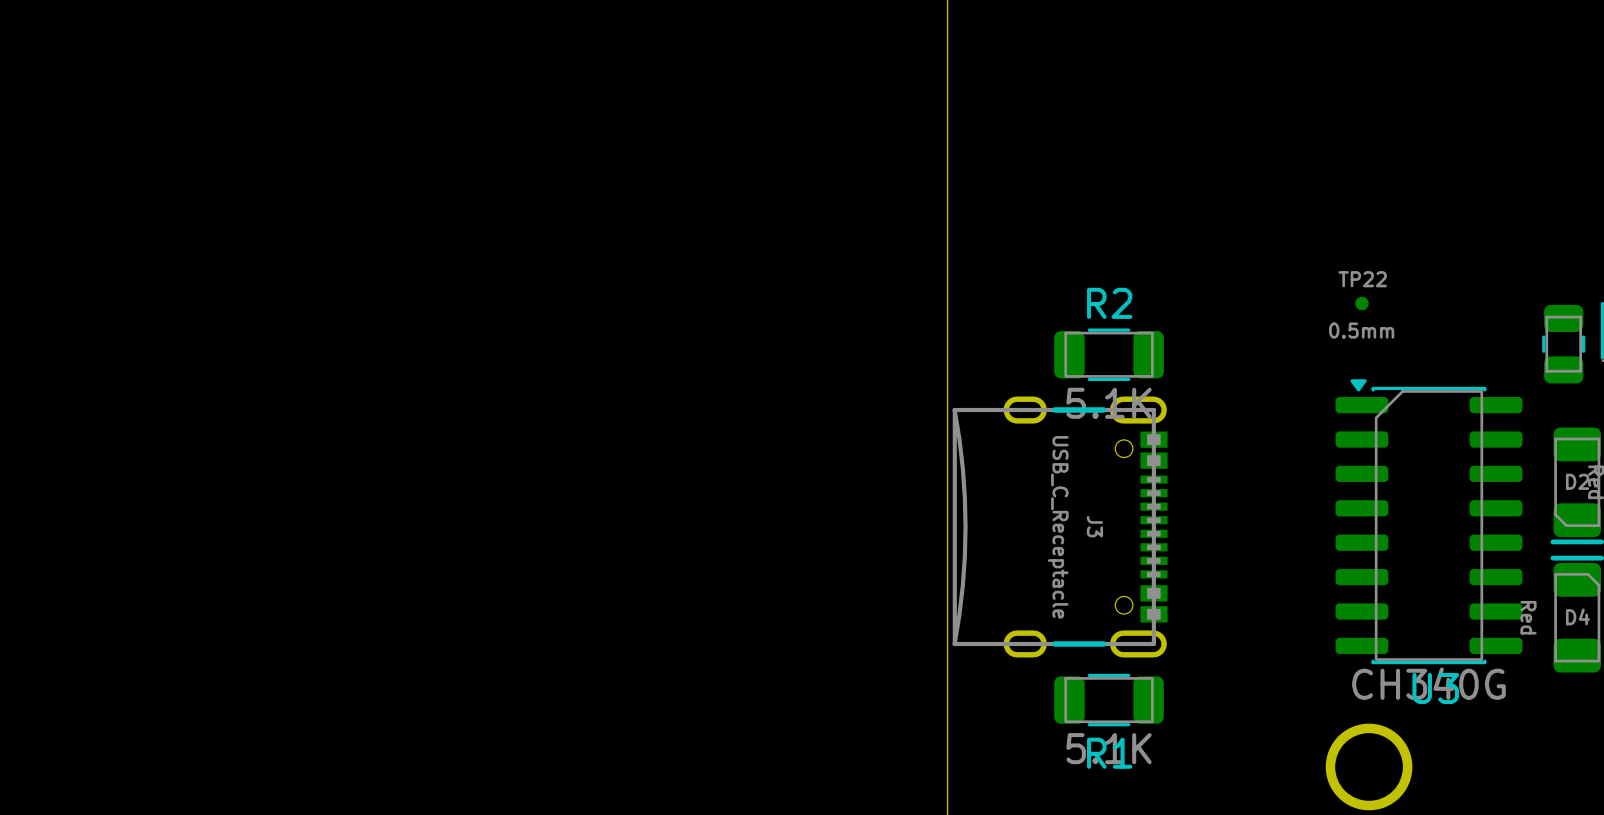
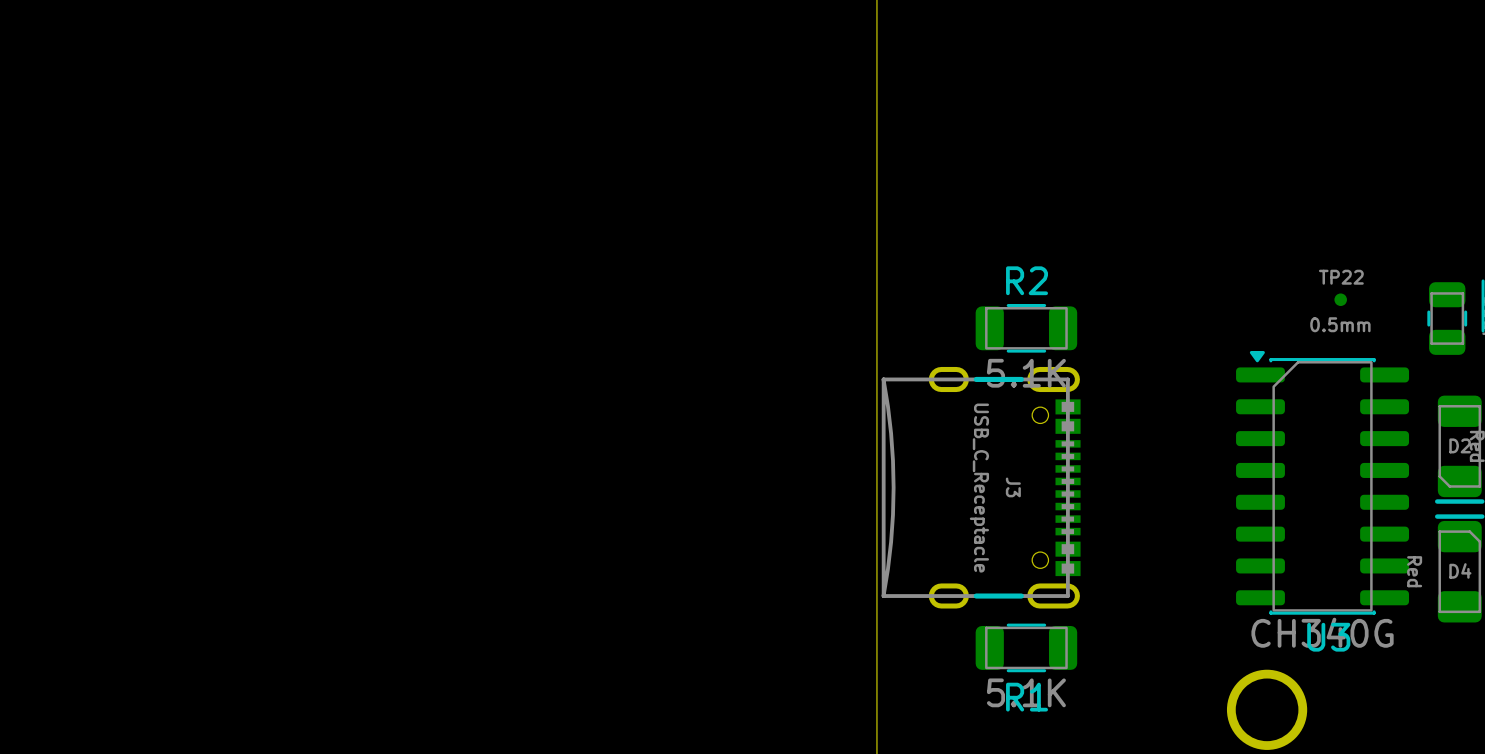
TP22 position: (1361, 303) -> (1340, 299)

